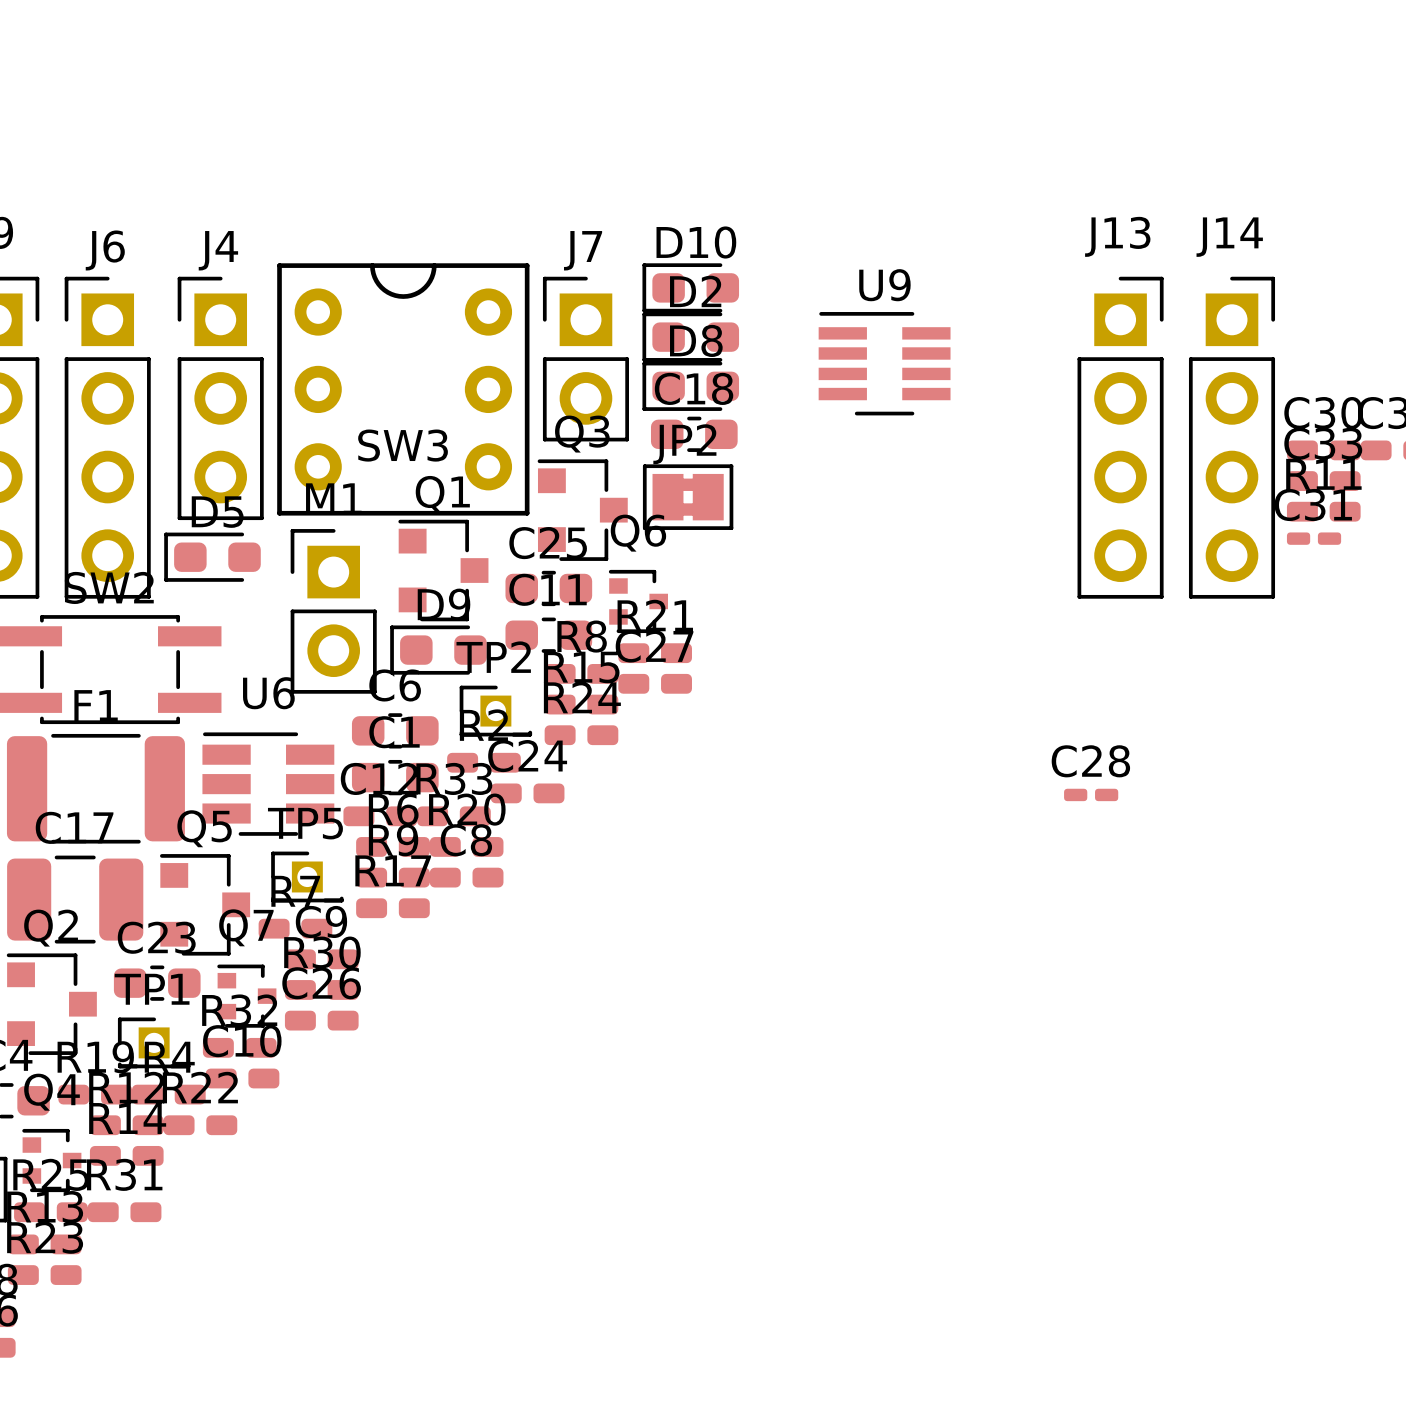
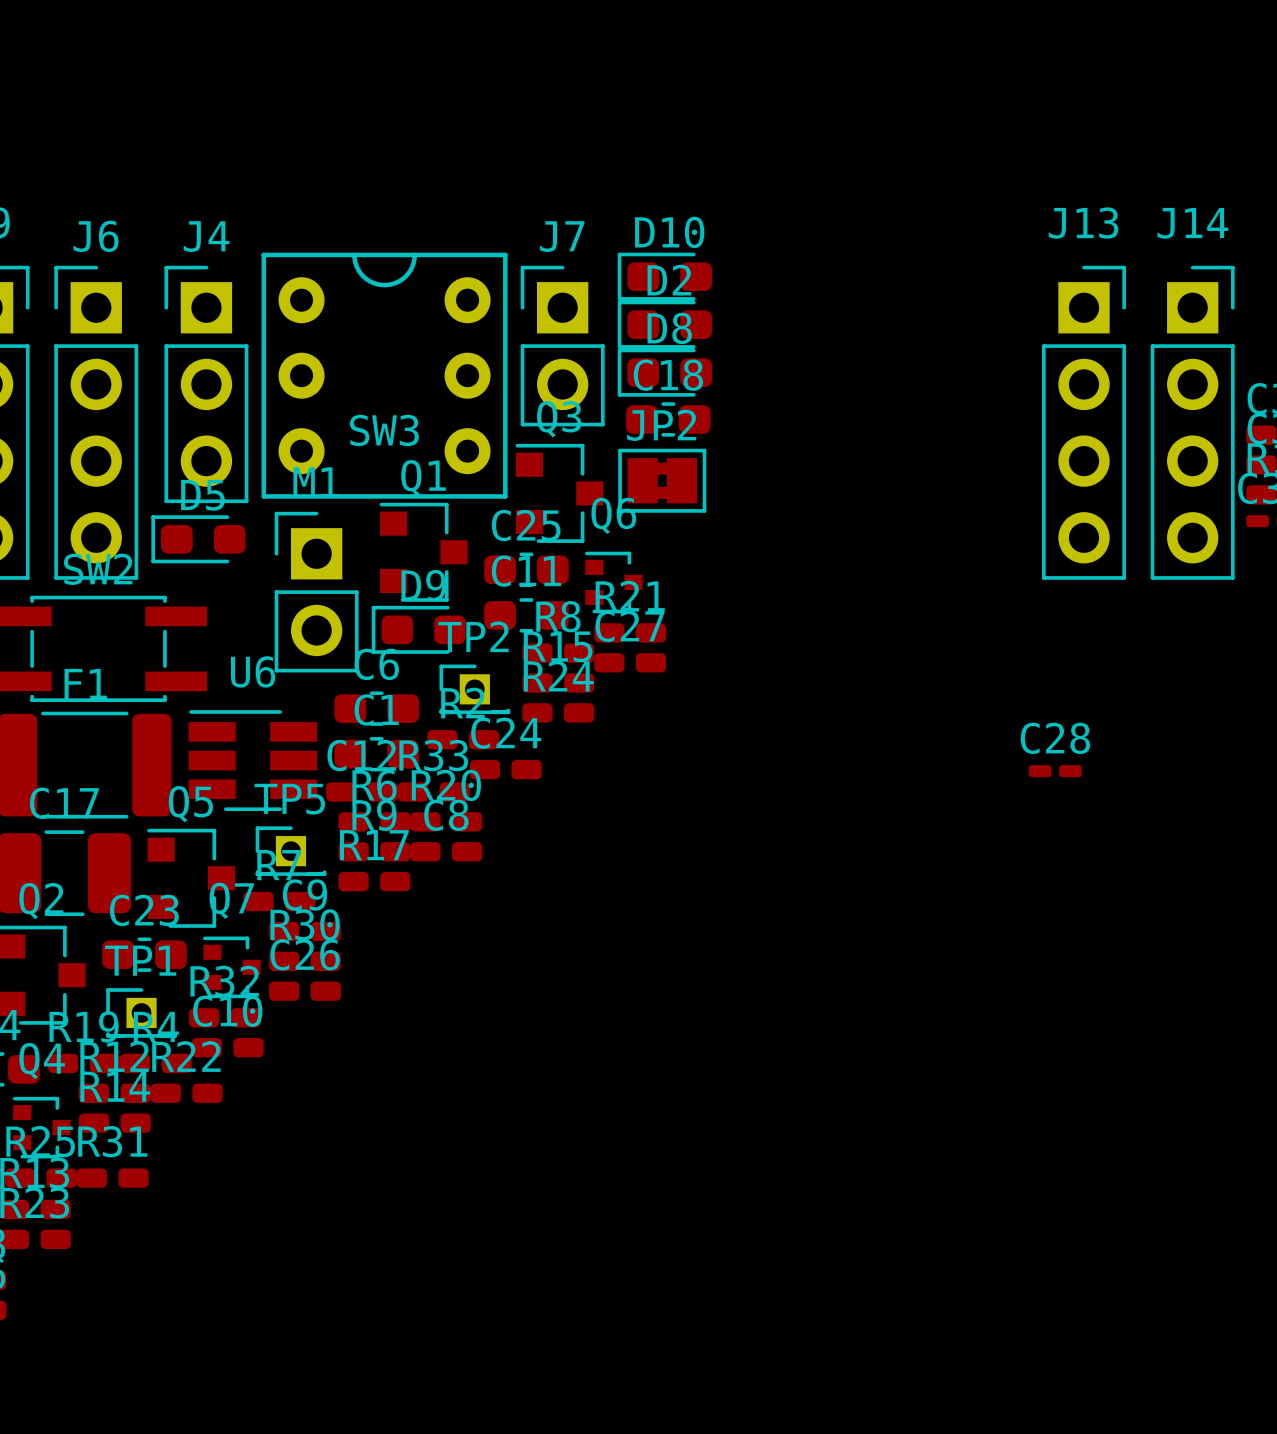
U9: (884, 363) -> none

